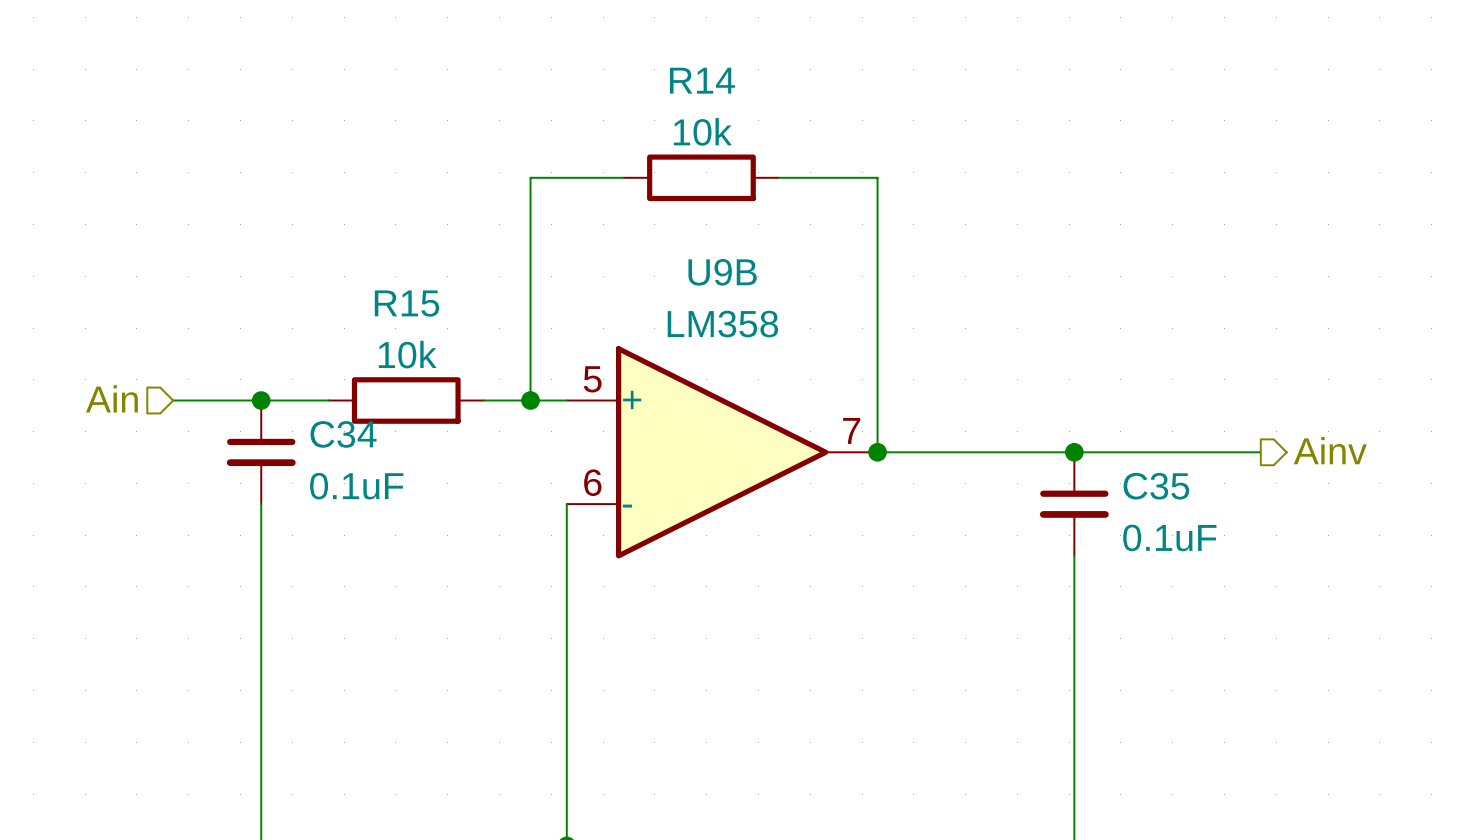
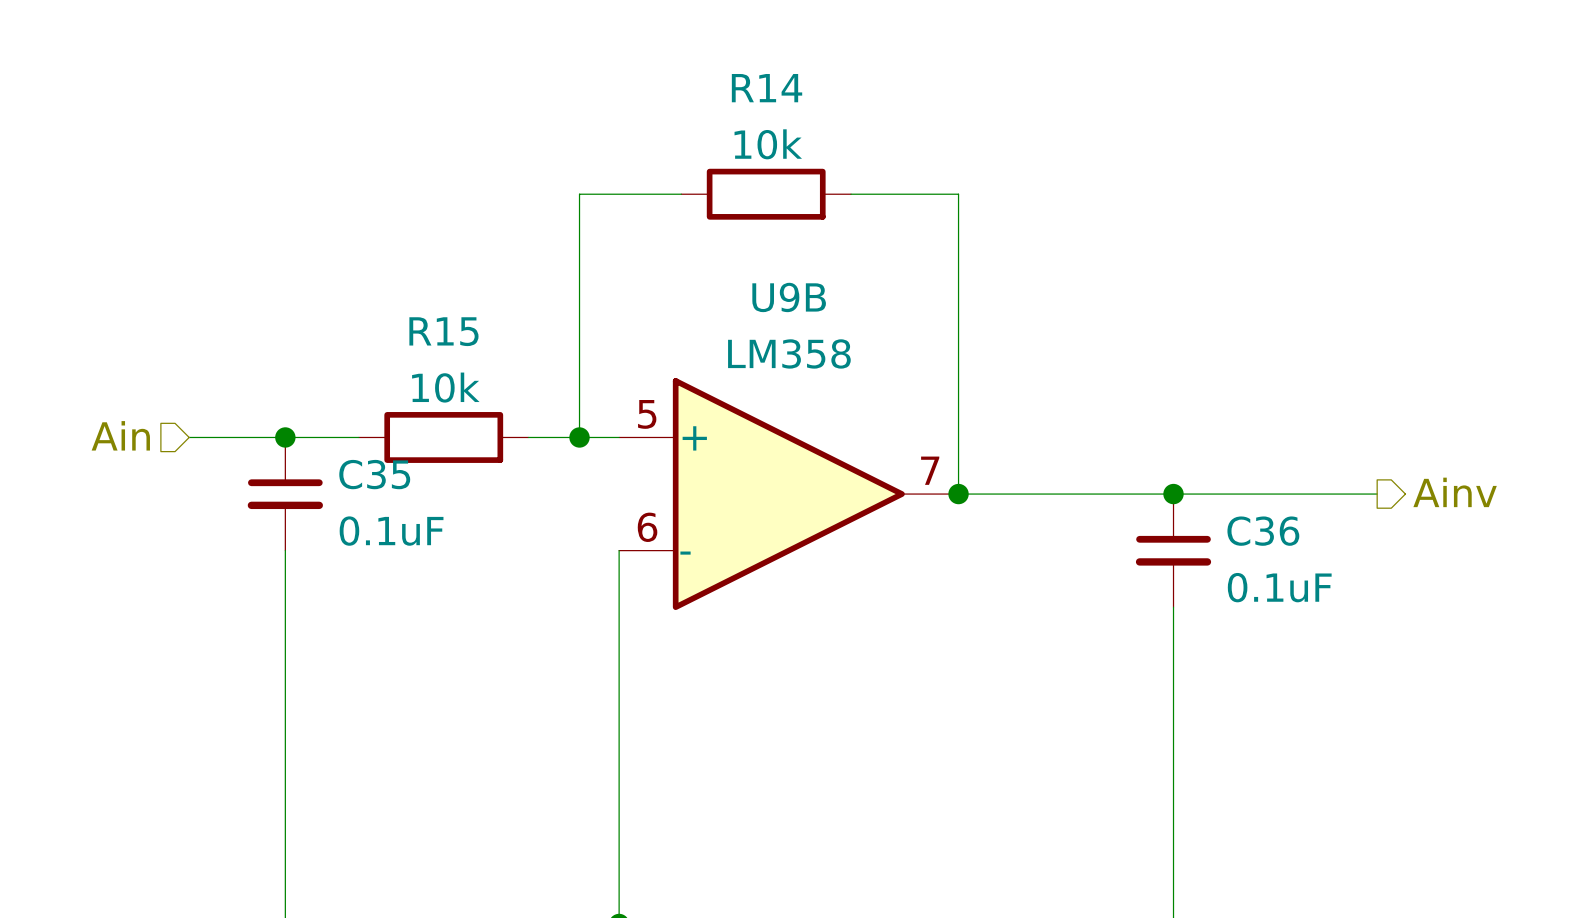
C34 name: C34 (343, 434) -> C35 (374, 474)
C35 name: C35 (1156, 486) -> C36 (1263, 531)

